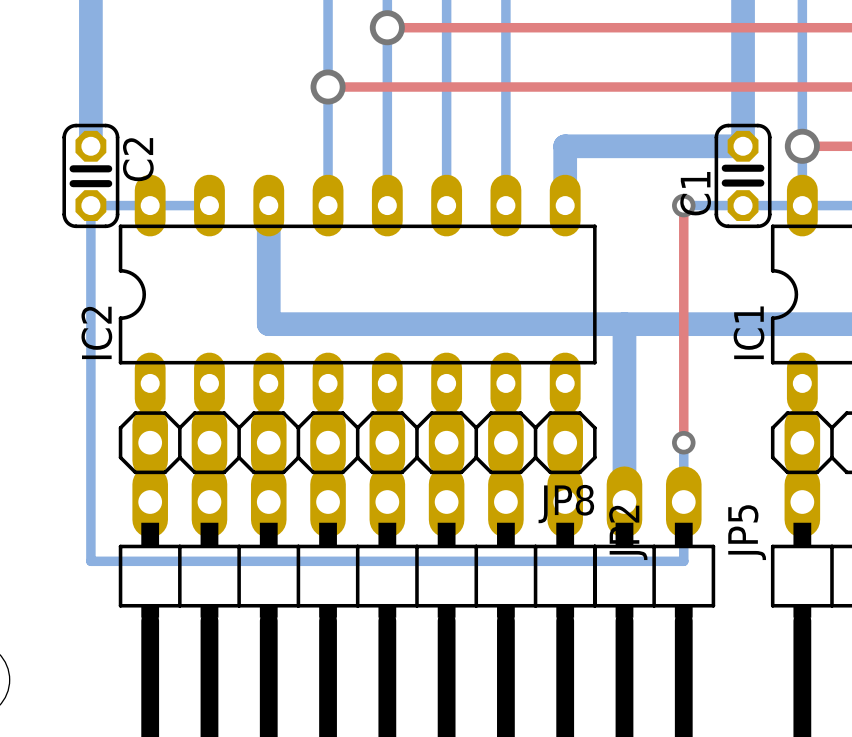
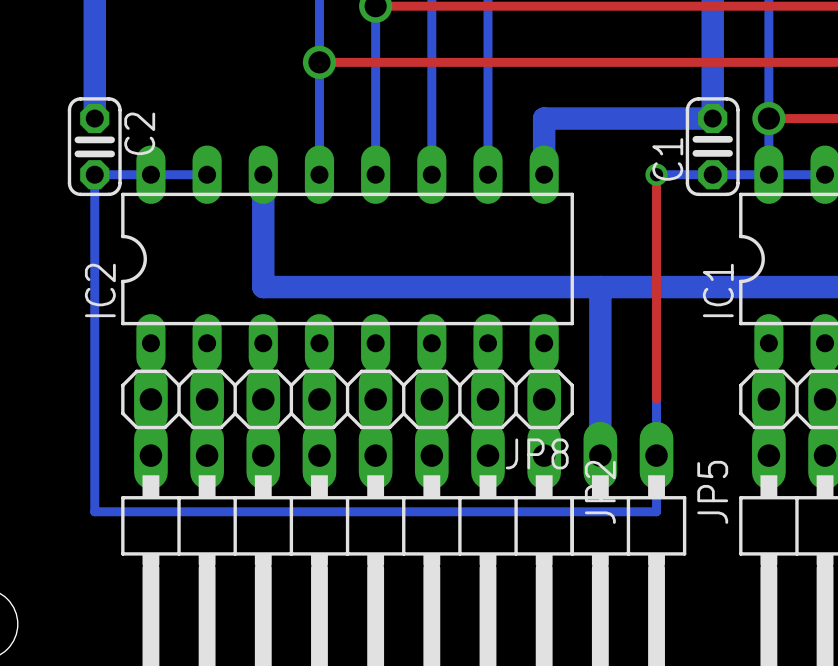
via: (683, 442) -> none

